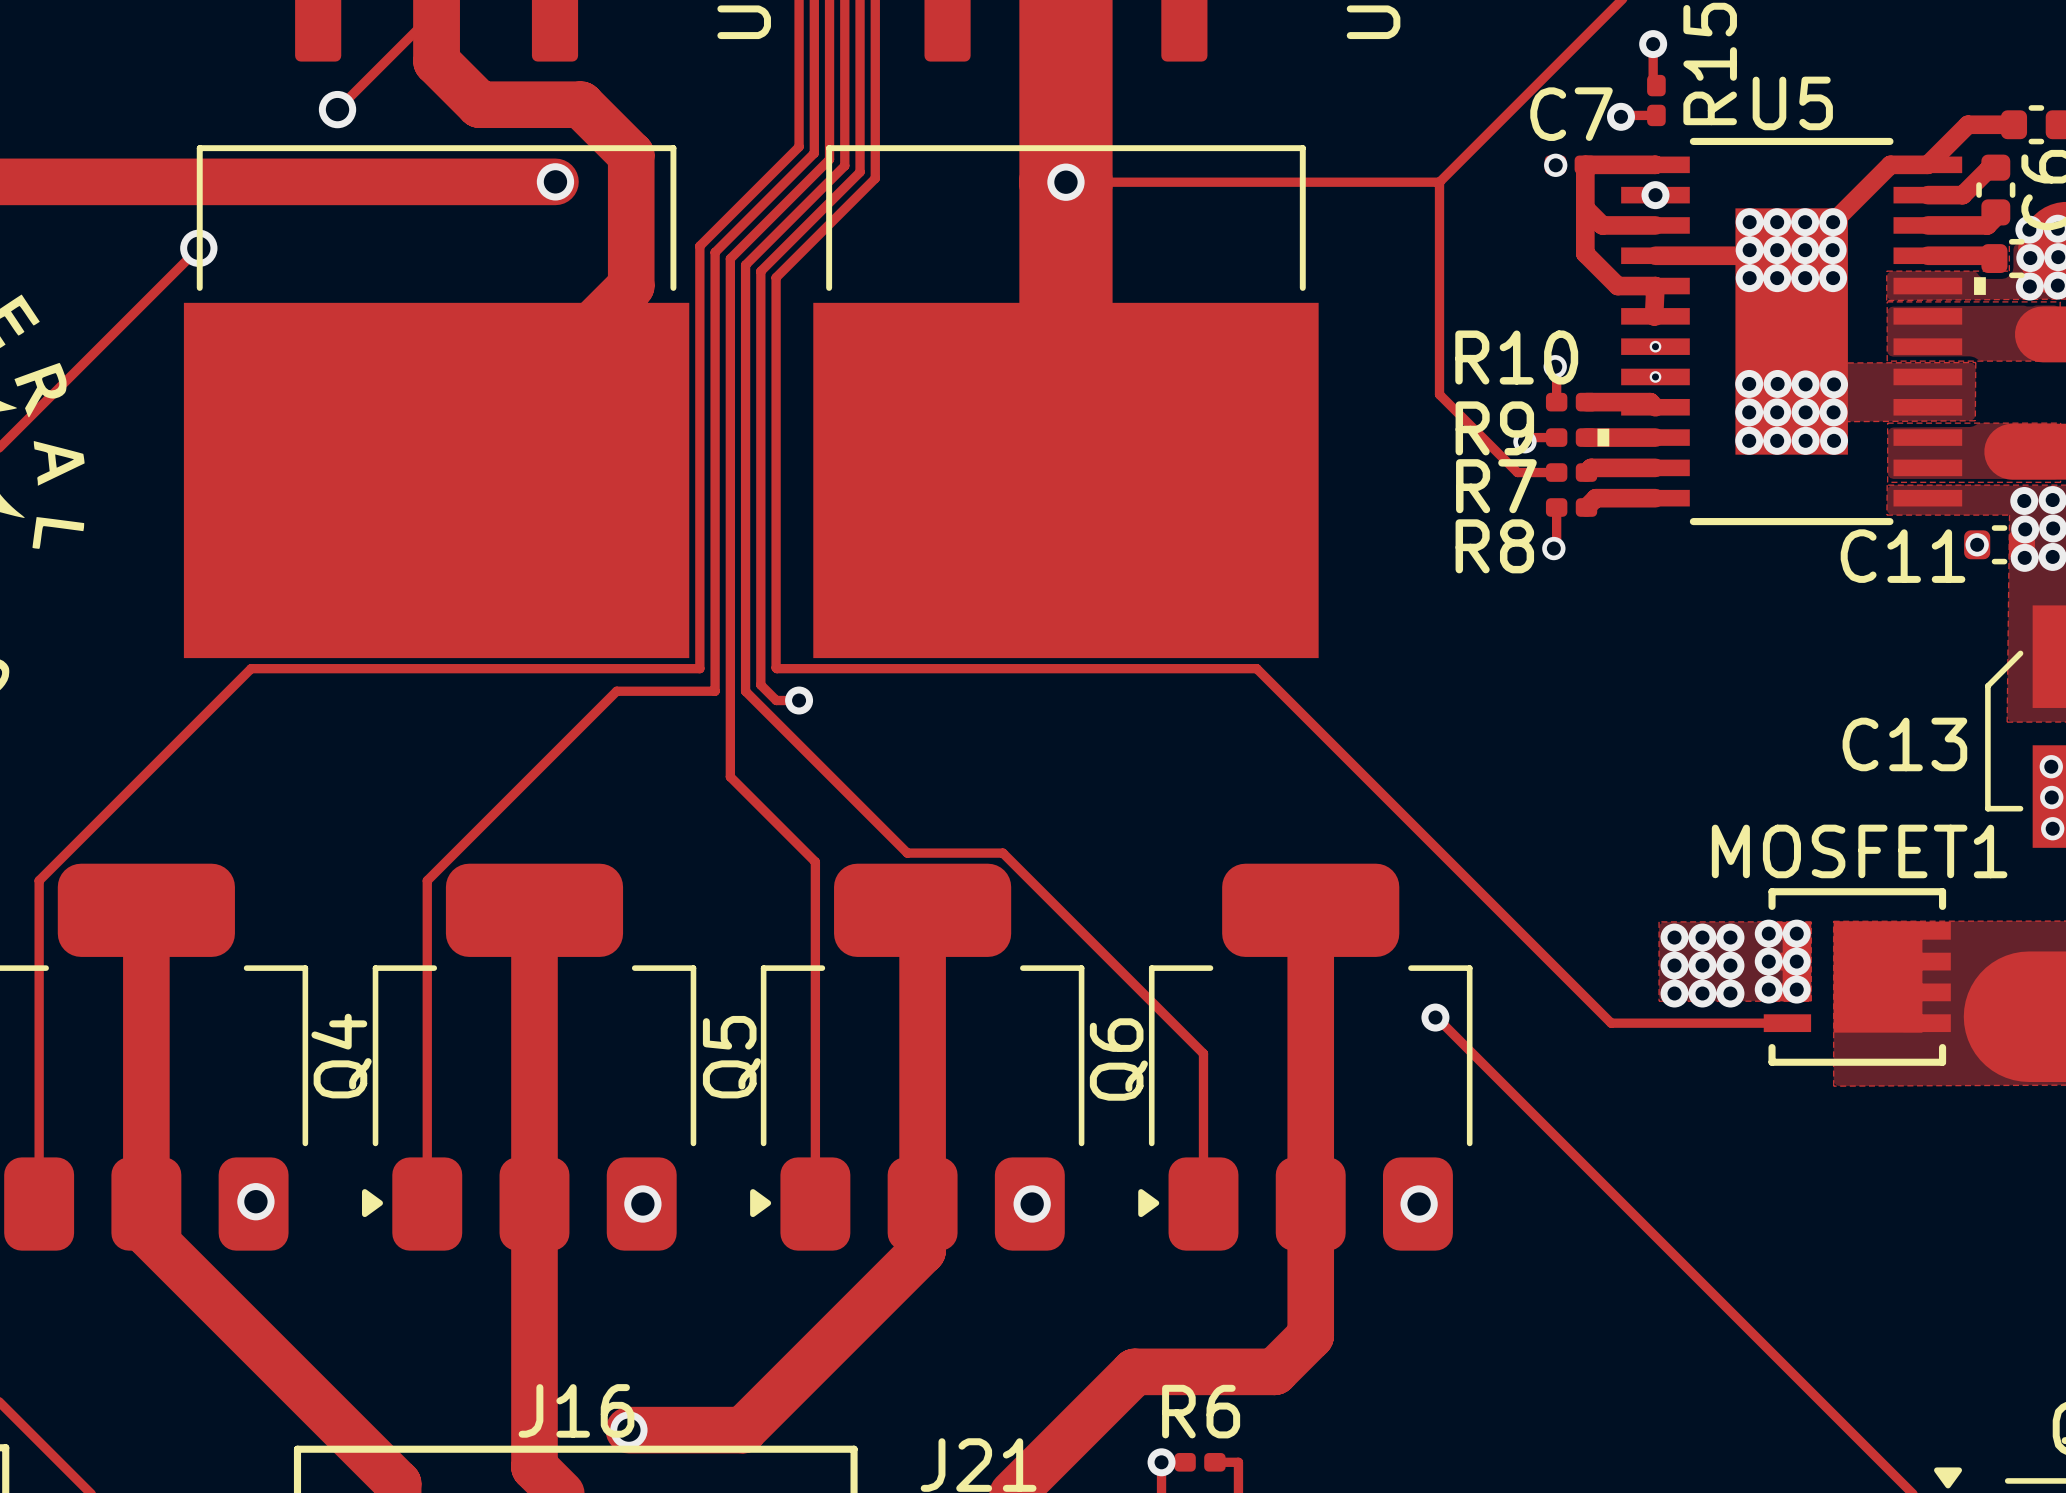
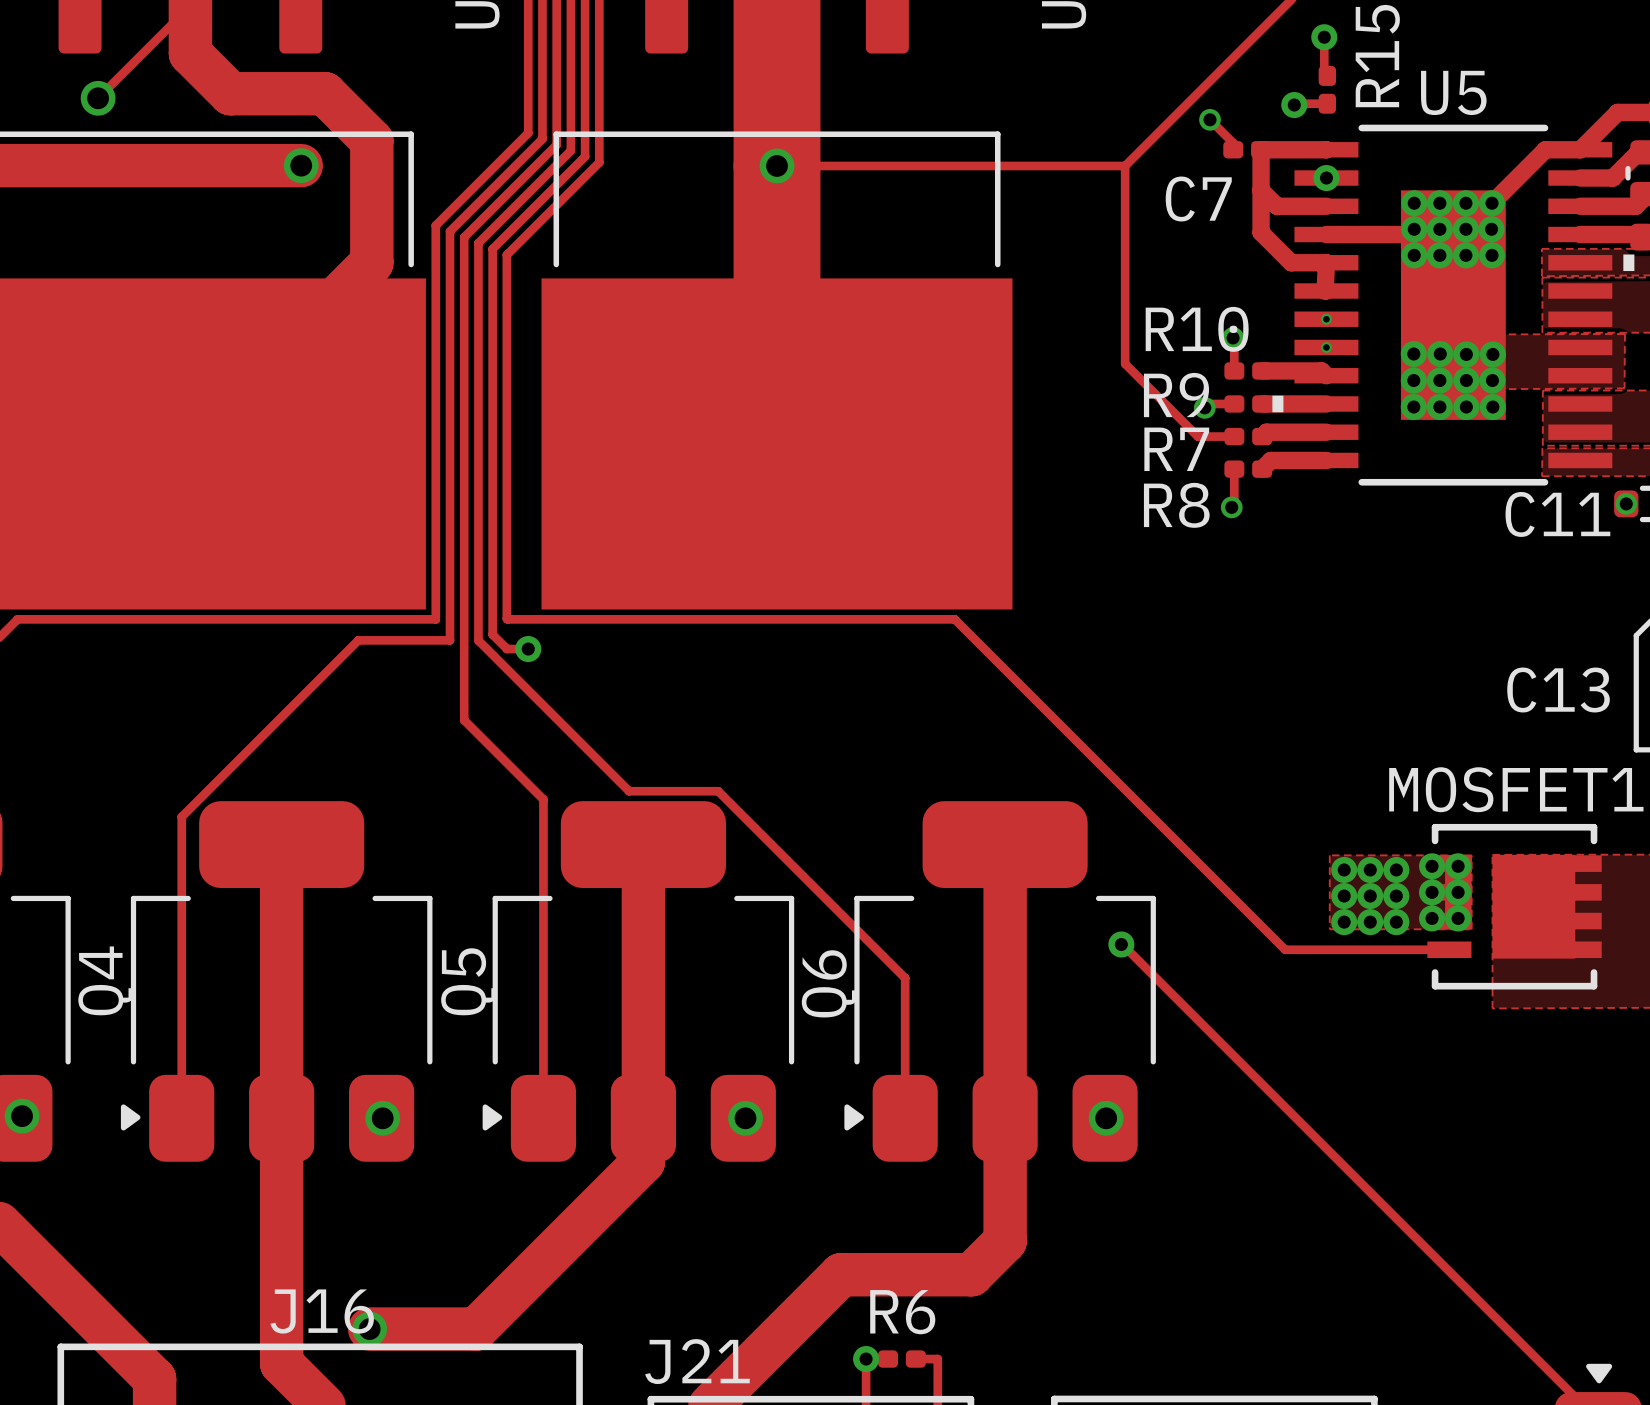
C7 name position: C7 (1571, 114) -> C7 (1198, 199)
track: none -> (1210, 119) (1233, 143) (1233, 149)
via position: (1555, 165) -> (1210, 119)

